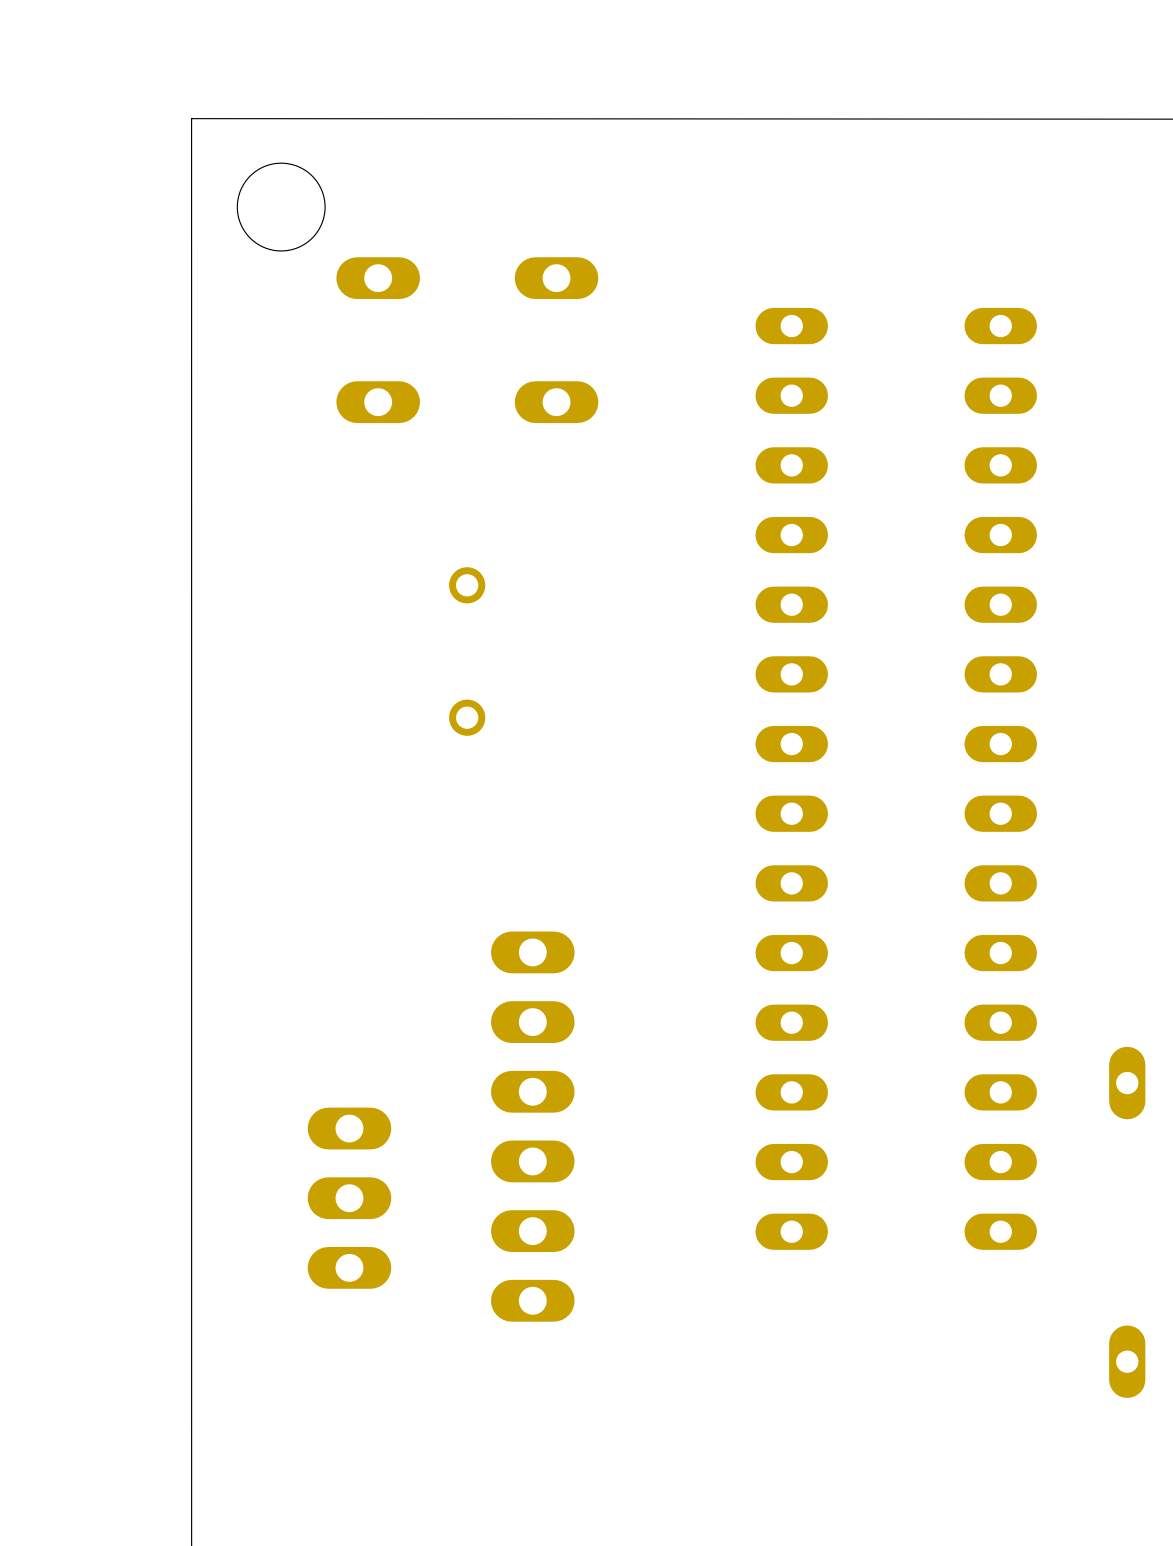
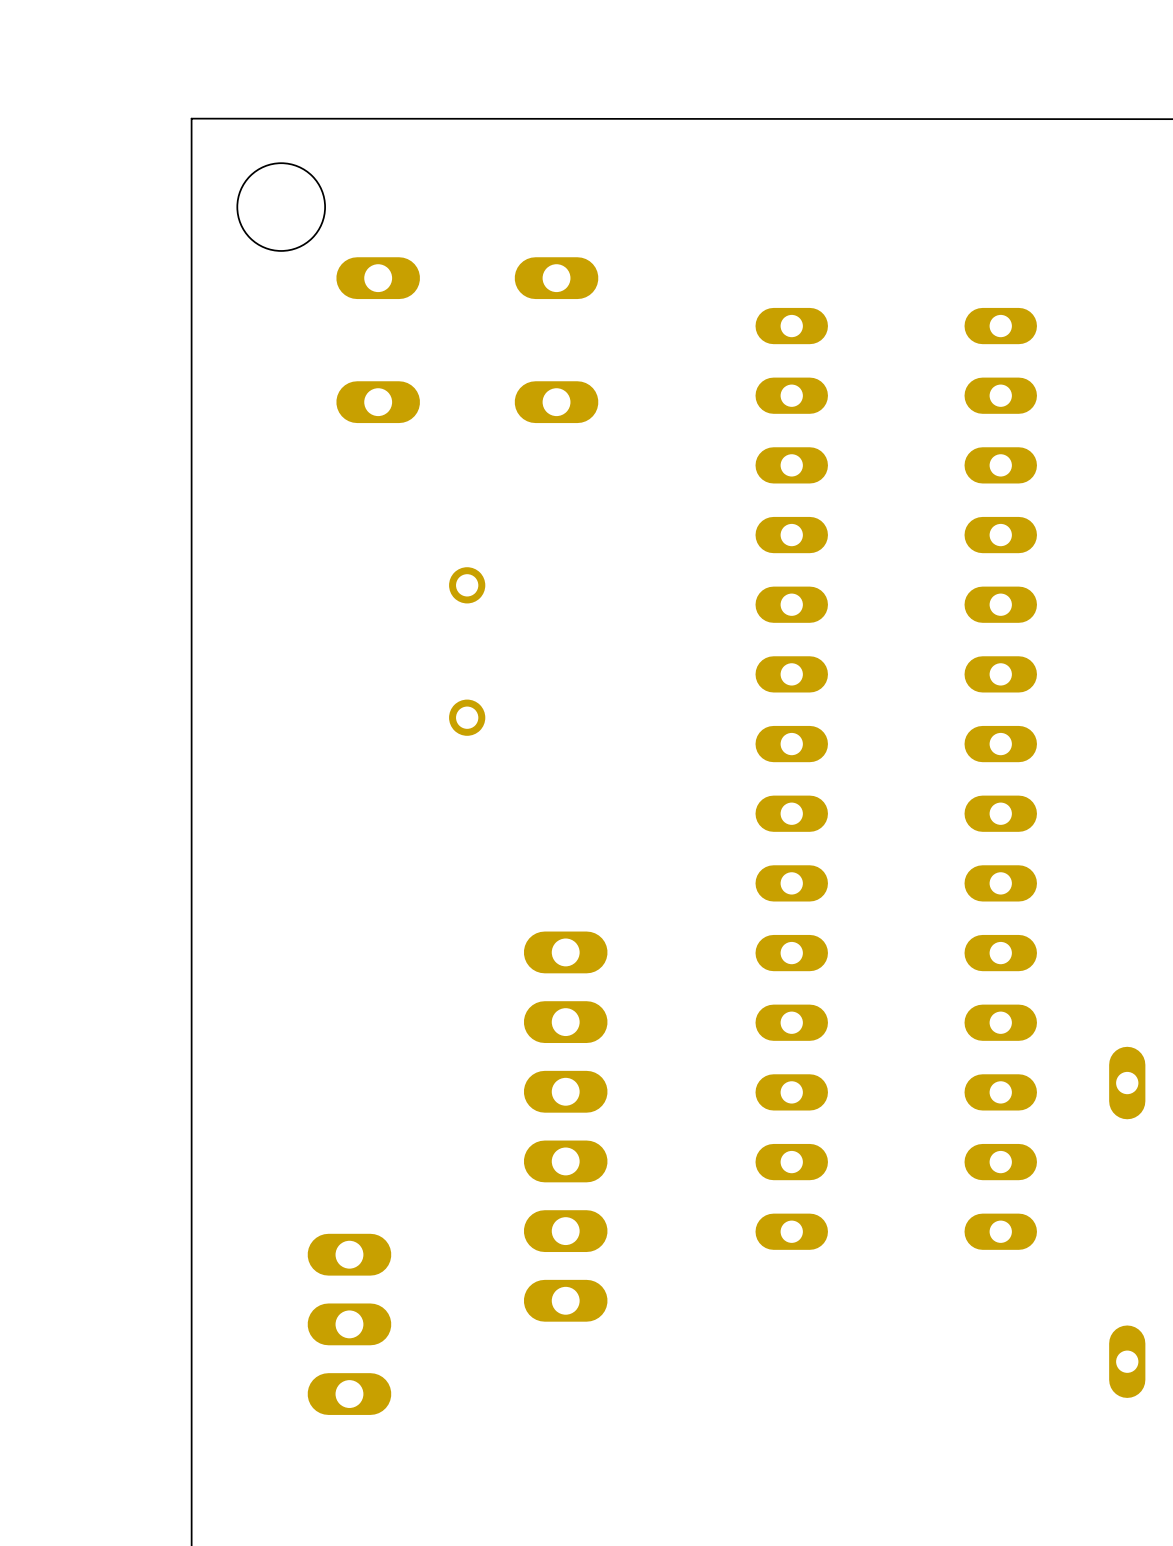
part position: (532, 1126) -> (565, 1126)
part position: (349, 1198) -> (349, 1324)

